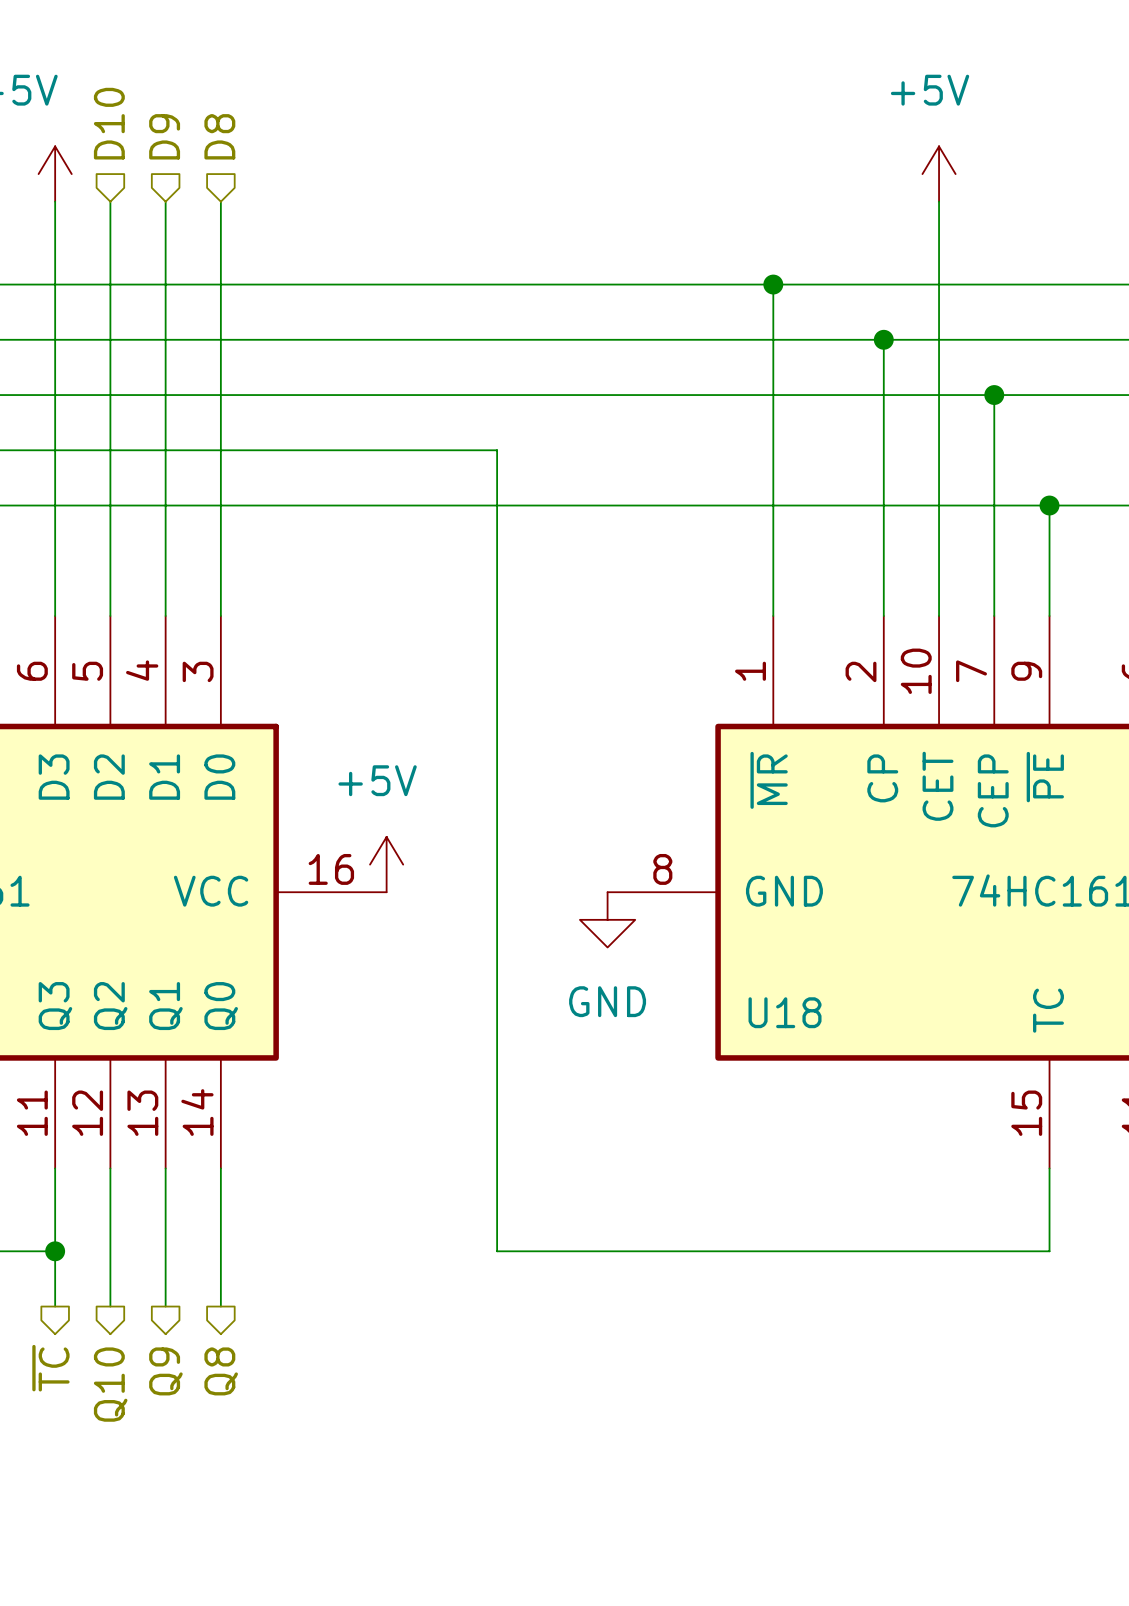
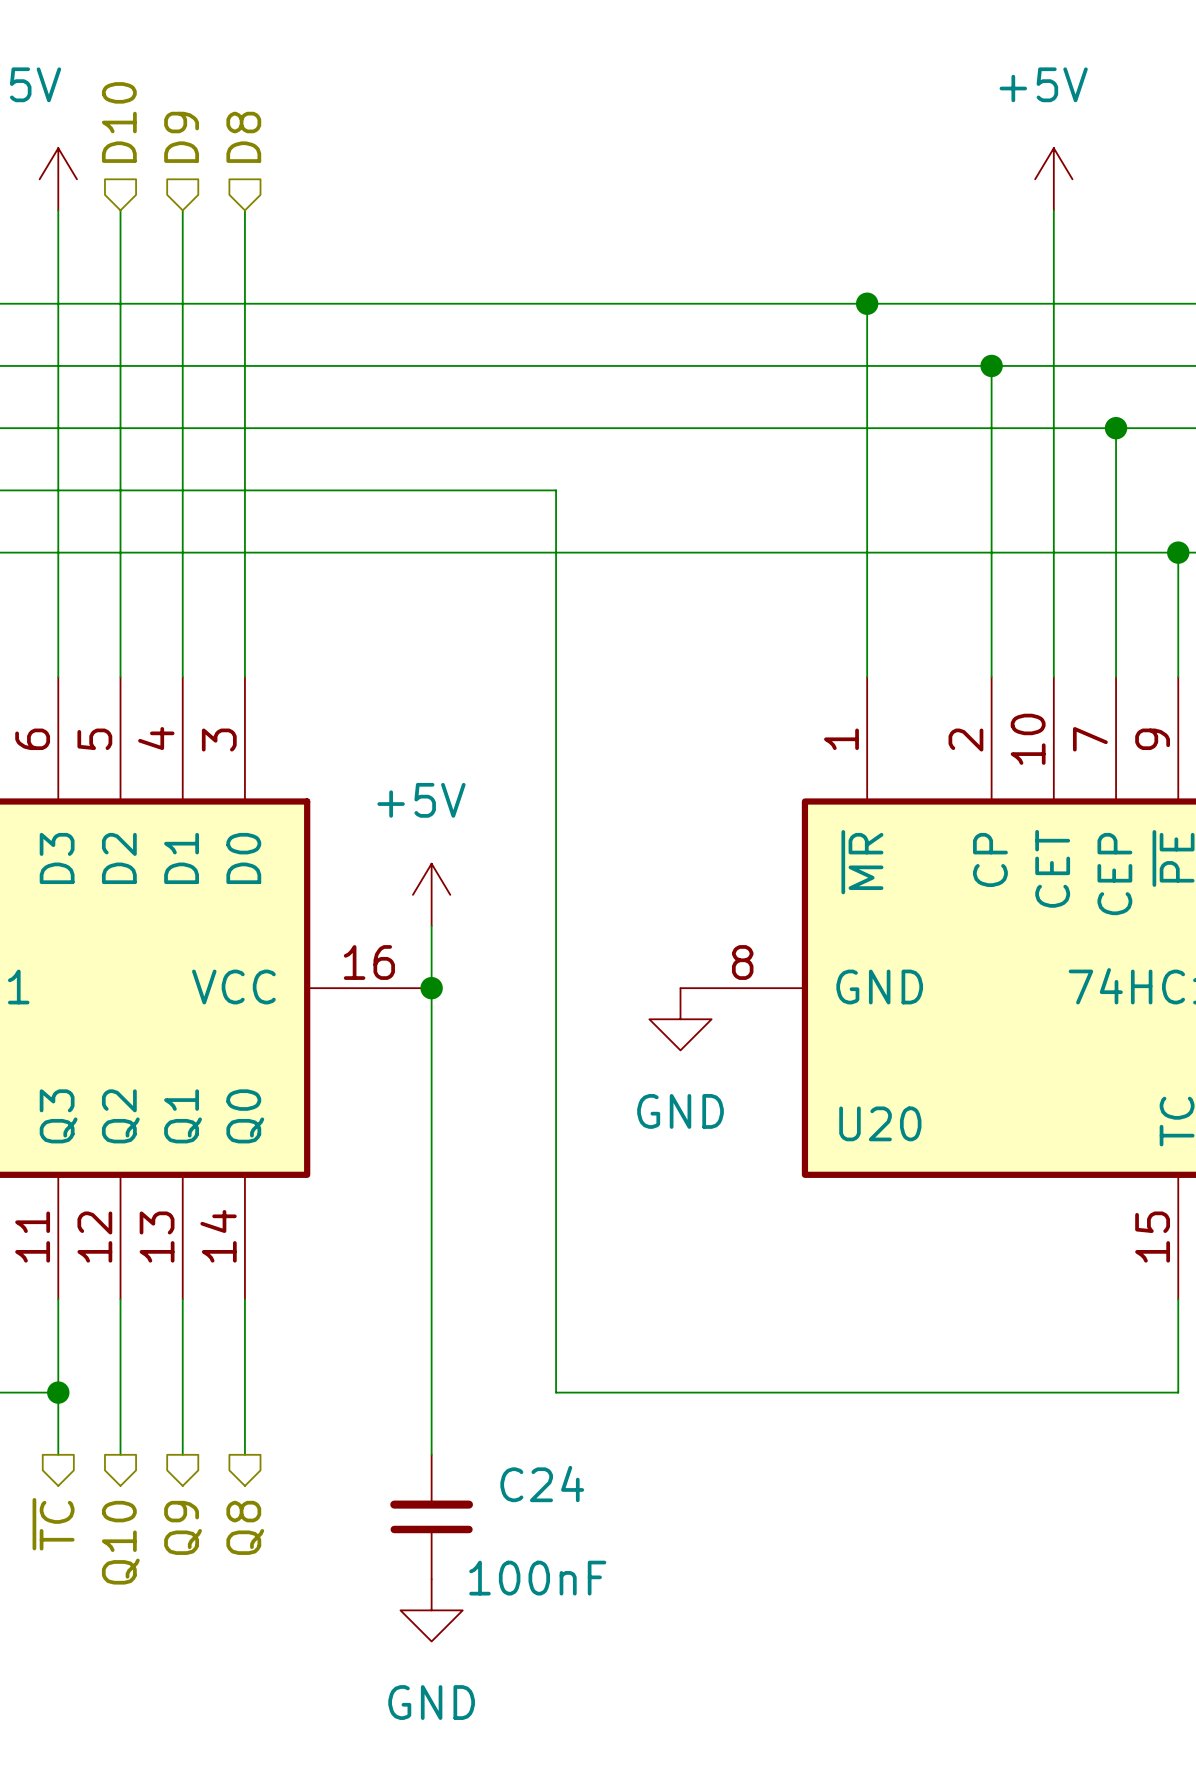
wire: none -> (431, 925) (431, 1454)
power symbol position: +5V (386, 864) -> +5V (431, 894)
junction: none -> (431, 988)
U18 name: U18 (785, 1012) -> U20 (880, 1123)
C24: none -> 100nF (431, 1517)
power symbol: none -> GND (431, 1610)

